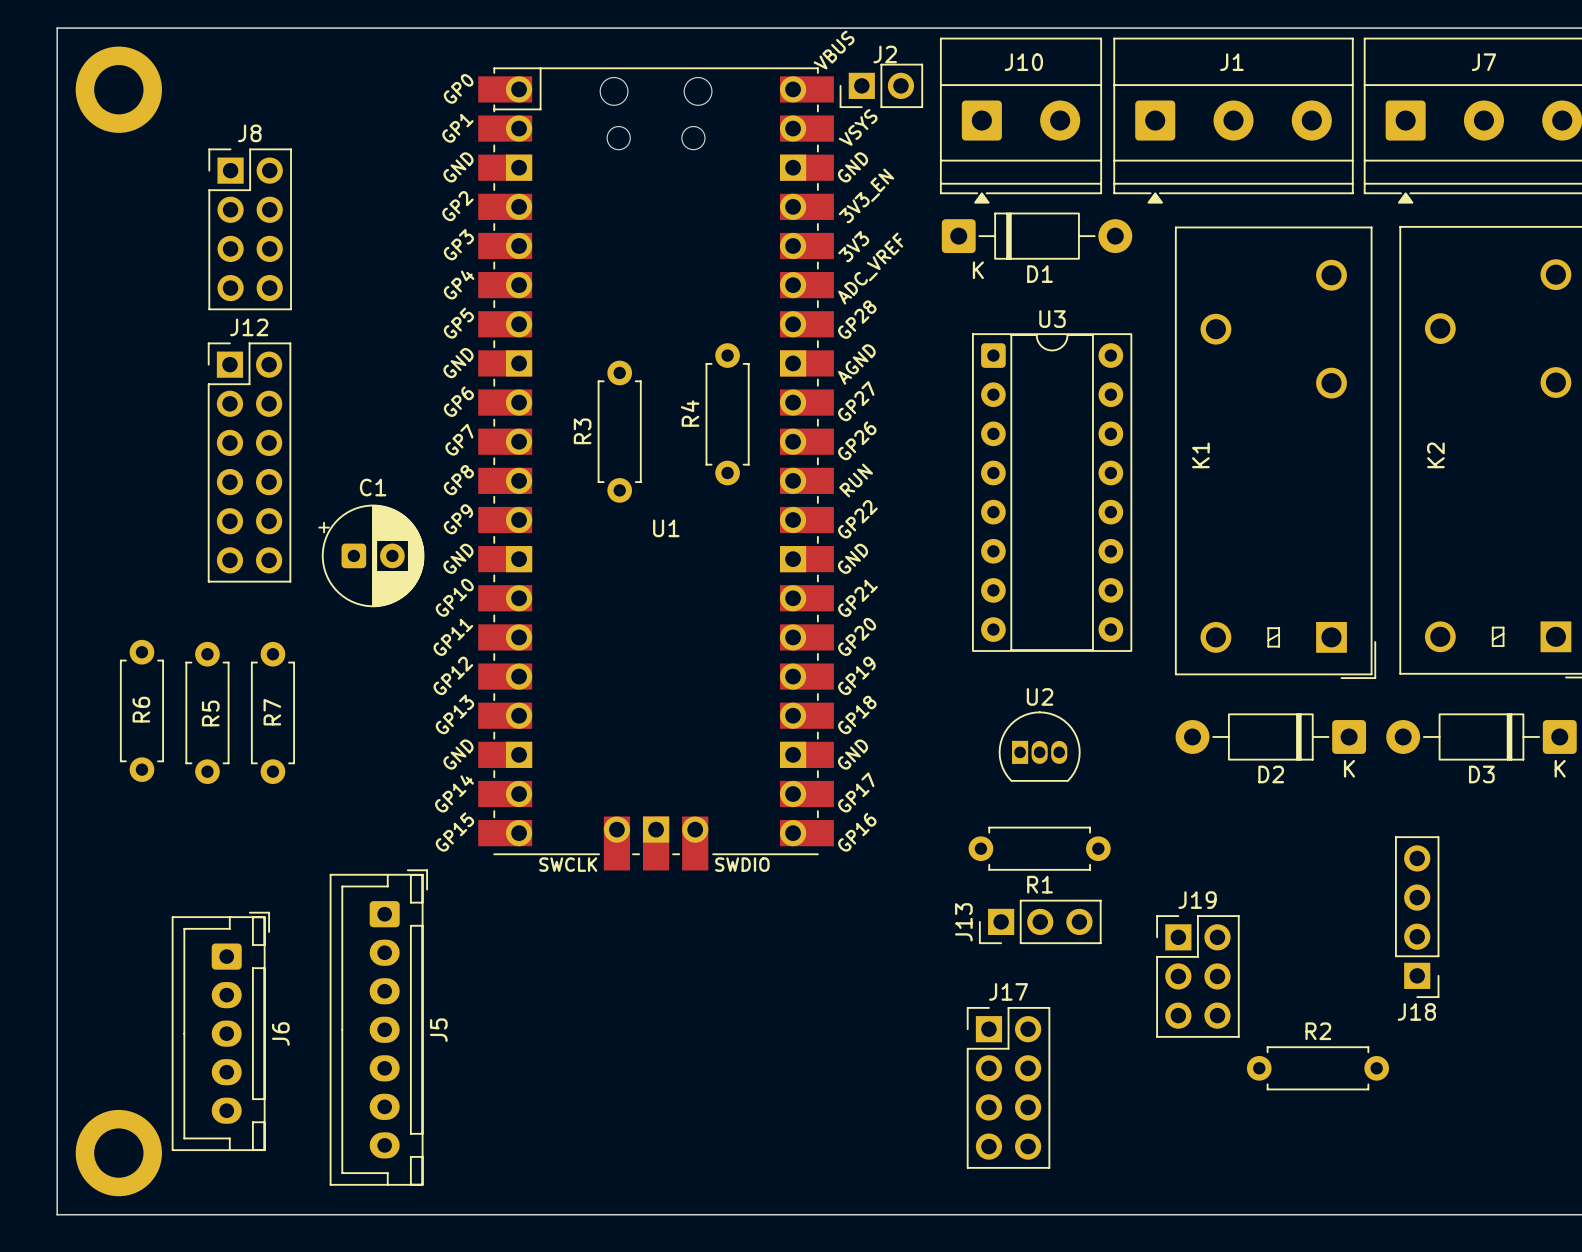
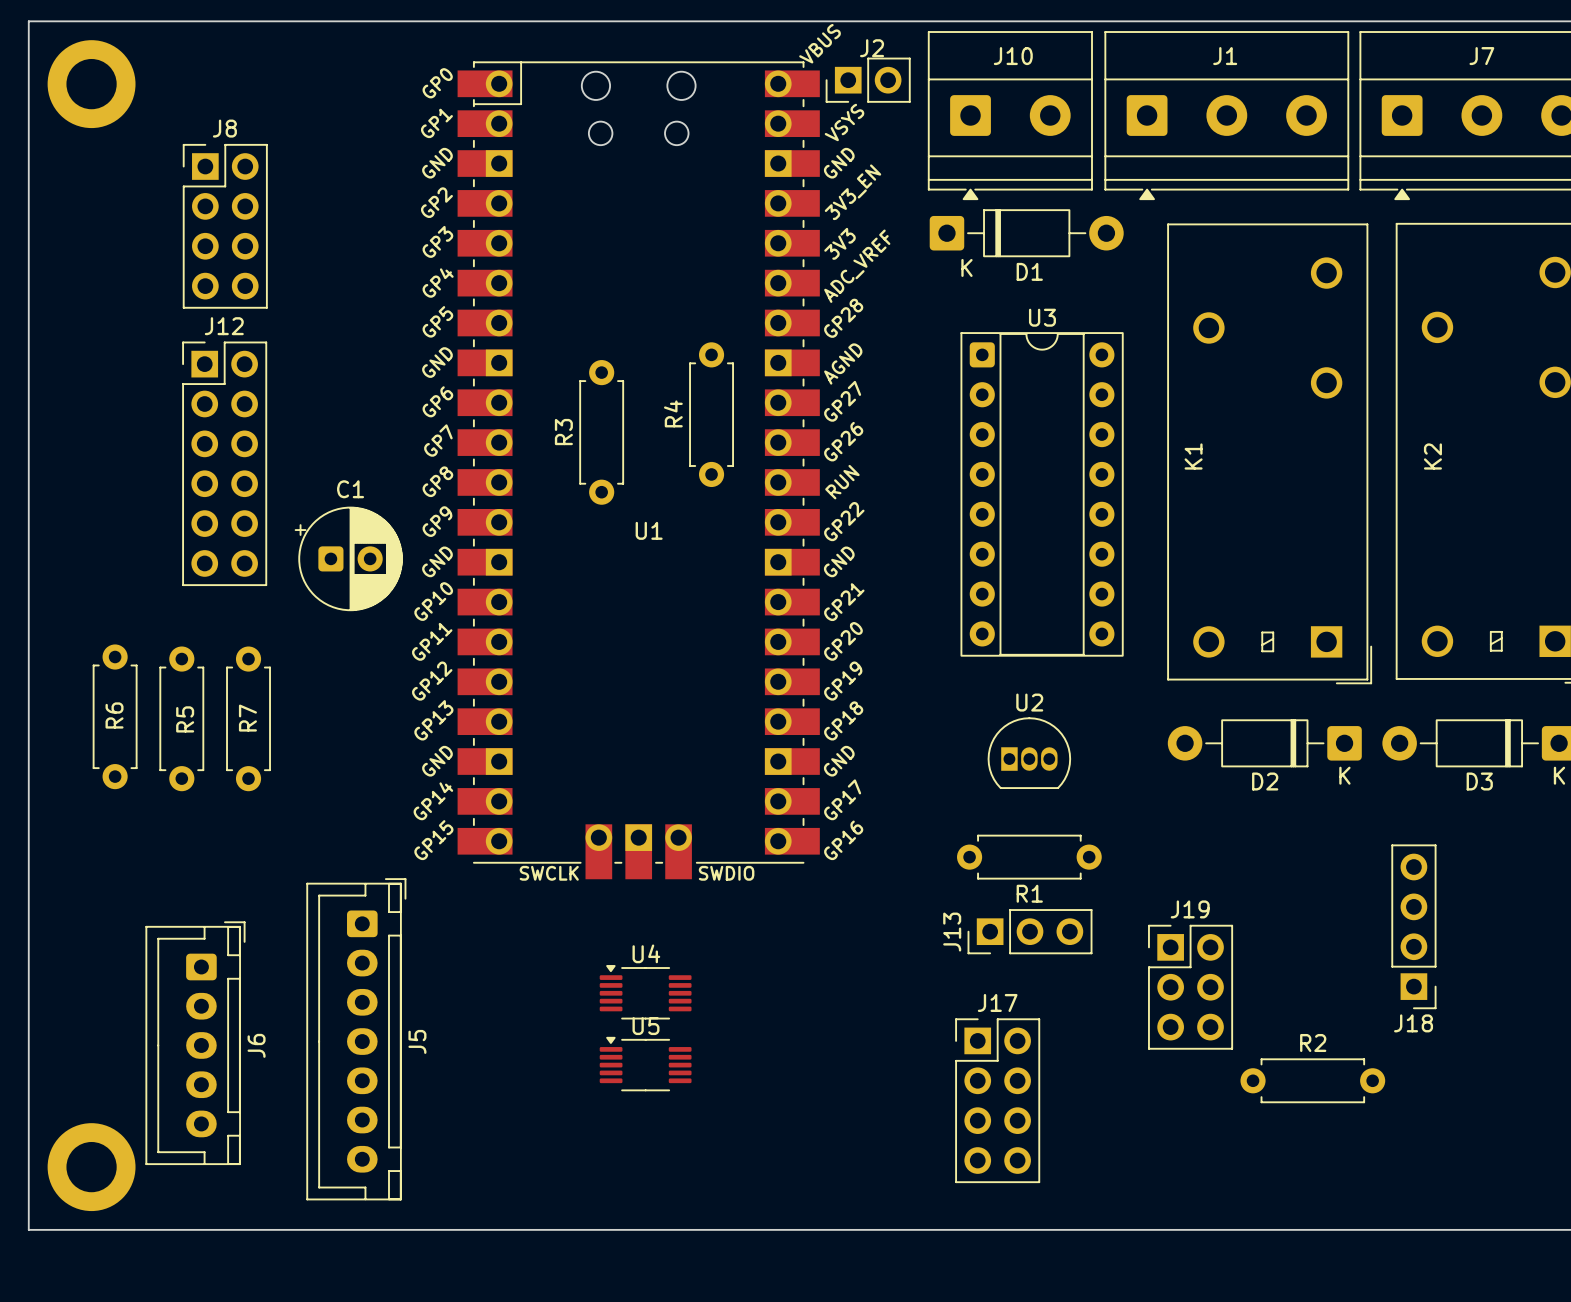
U4: none -> (645, 992)
U5: none -> (645, 1064)

